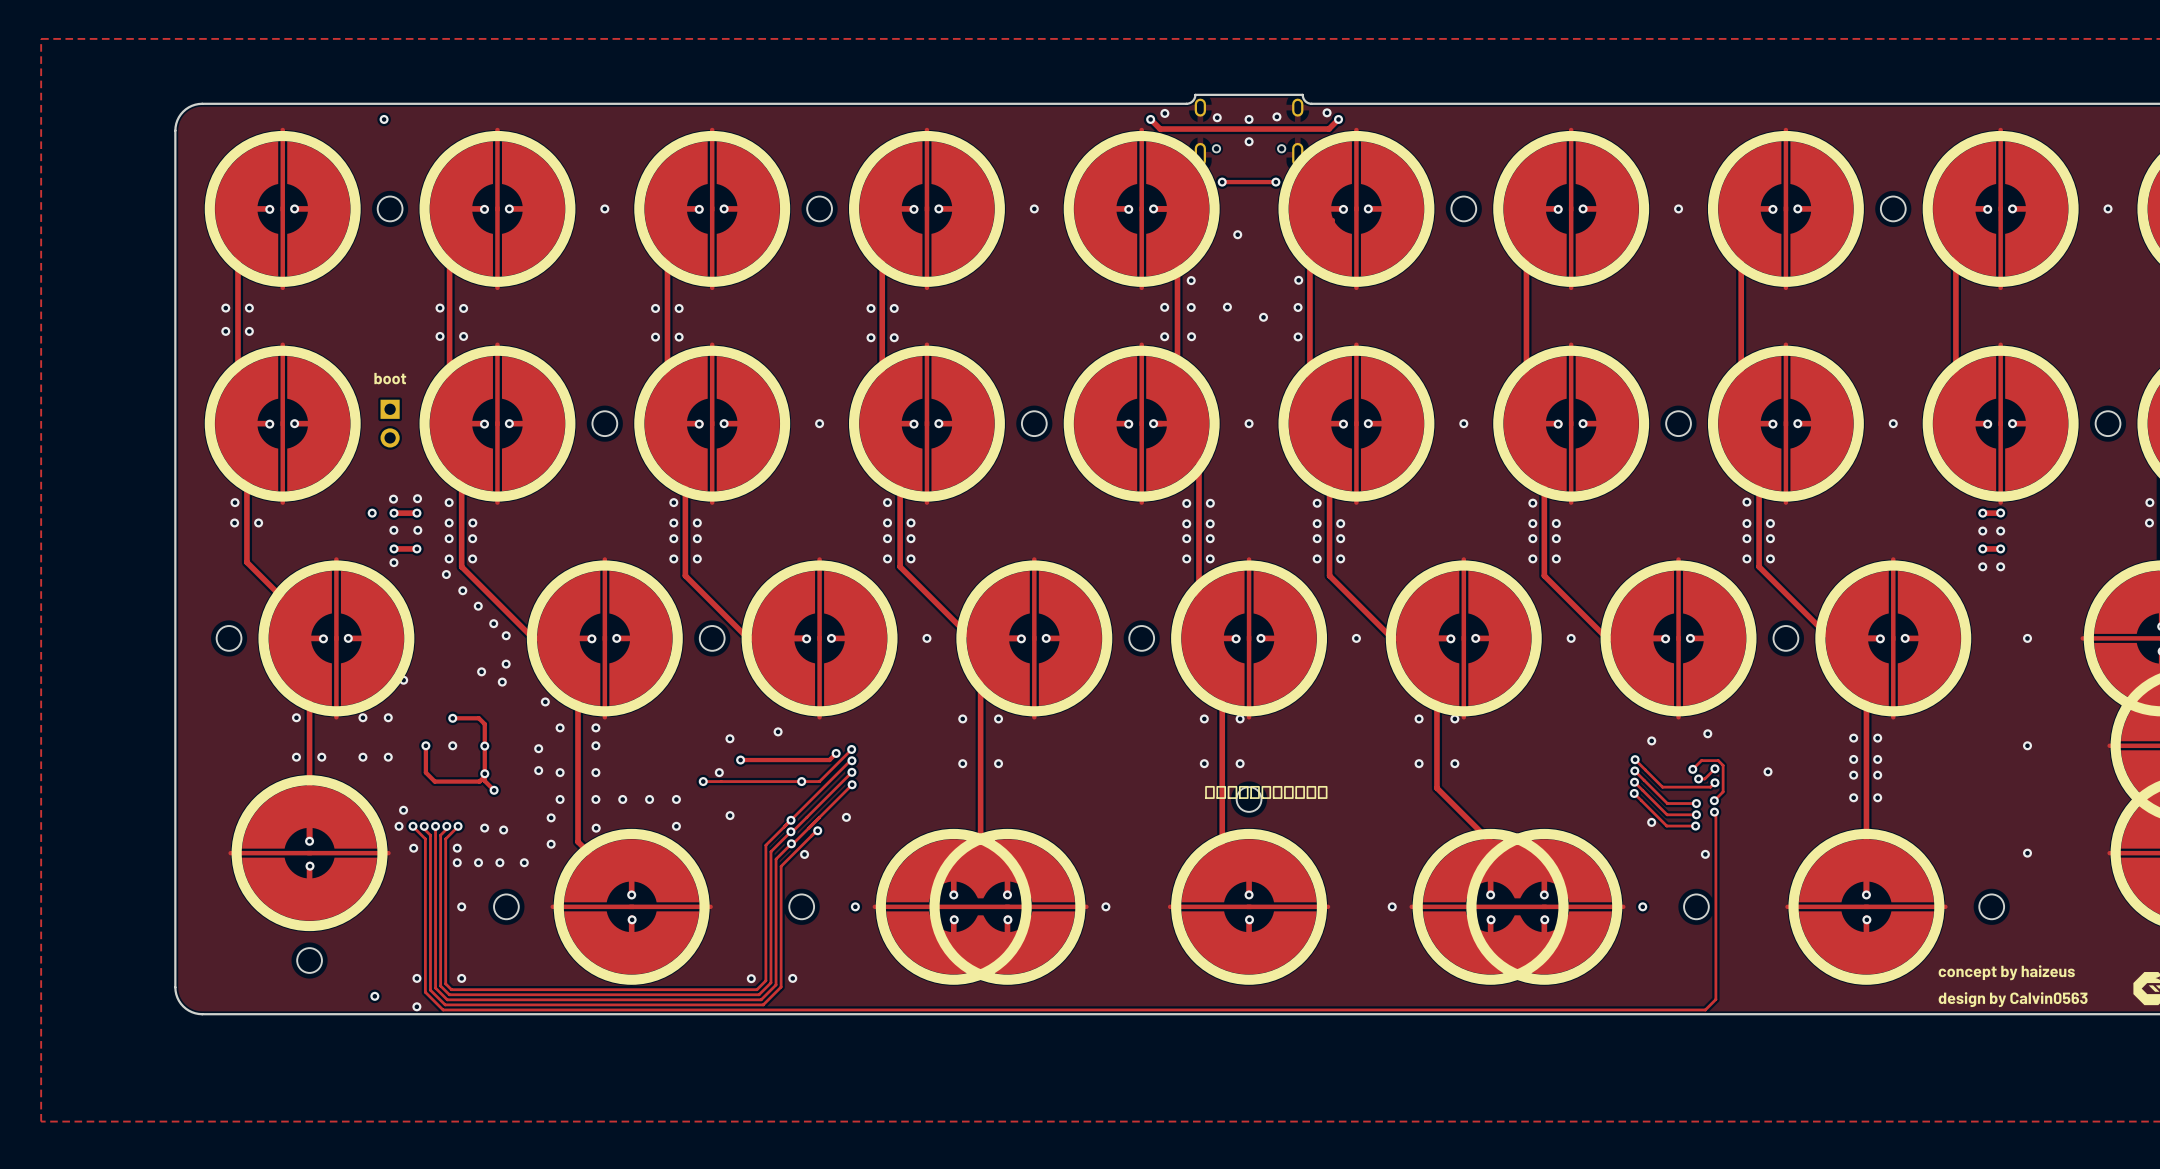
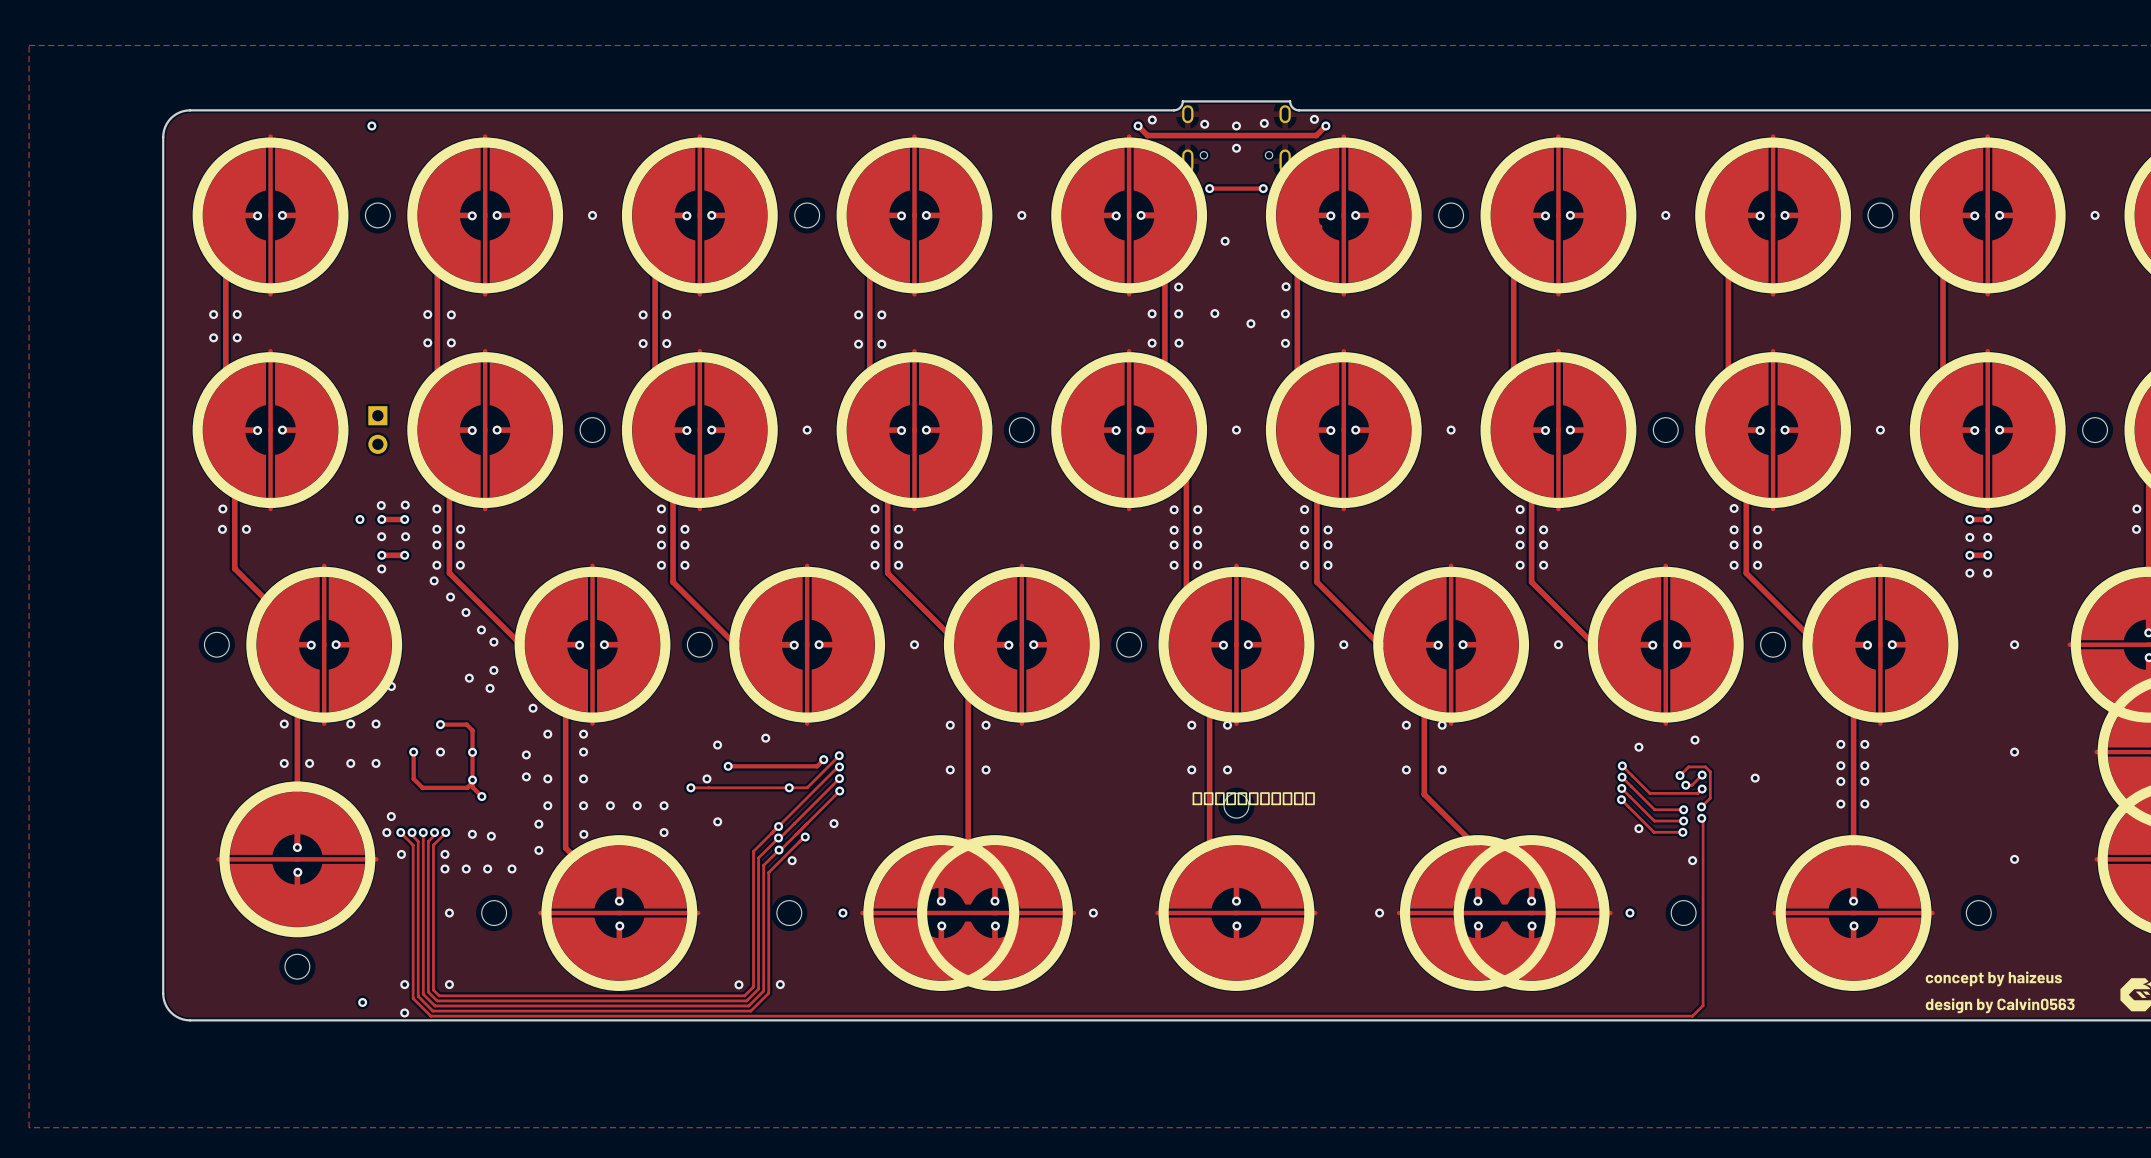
text: boot (390, 378) -> none

